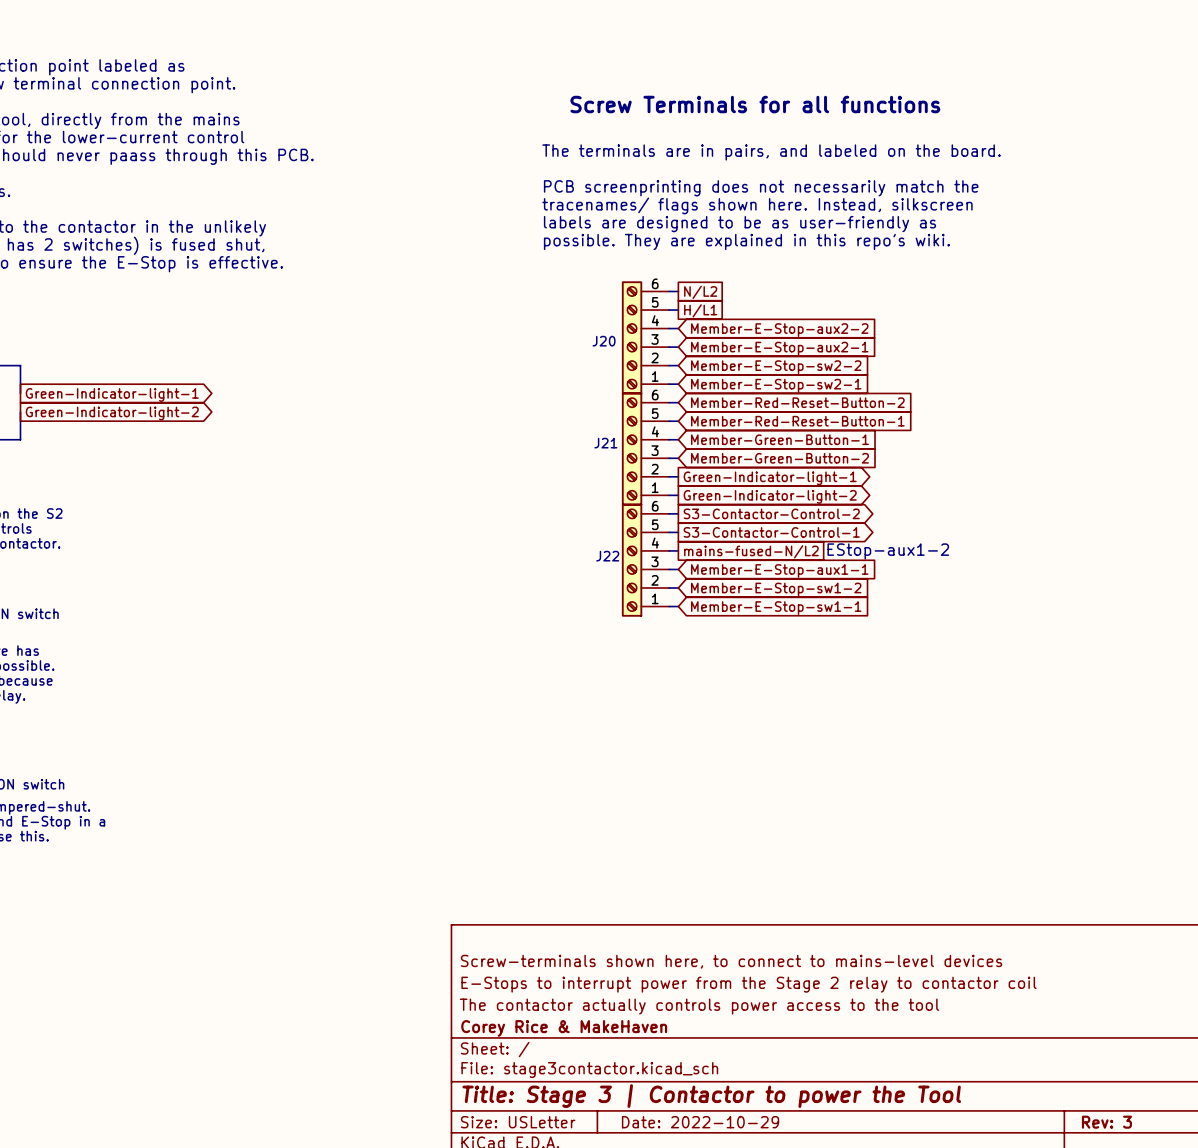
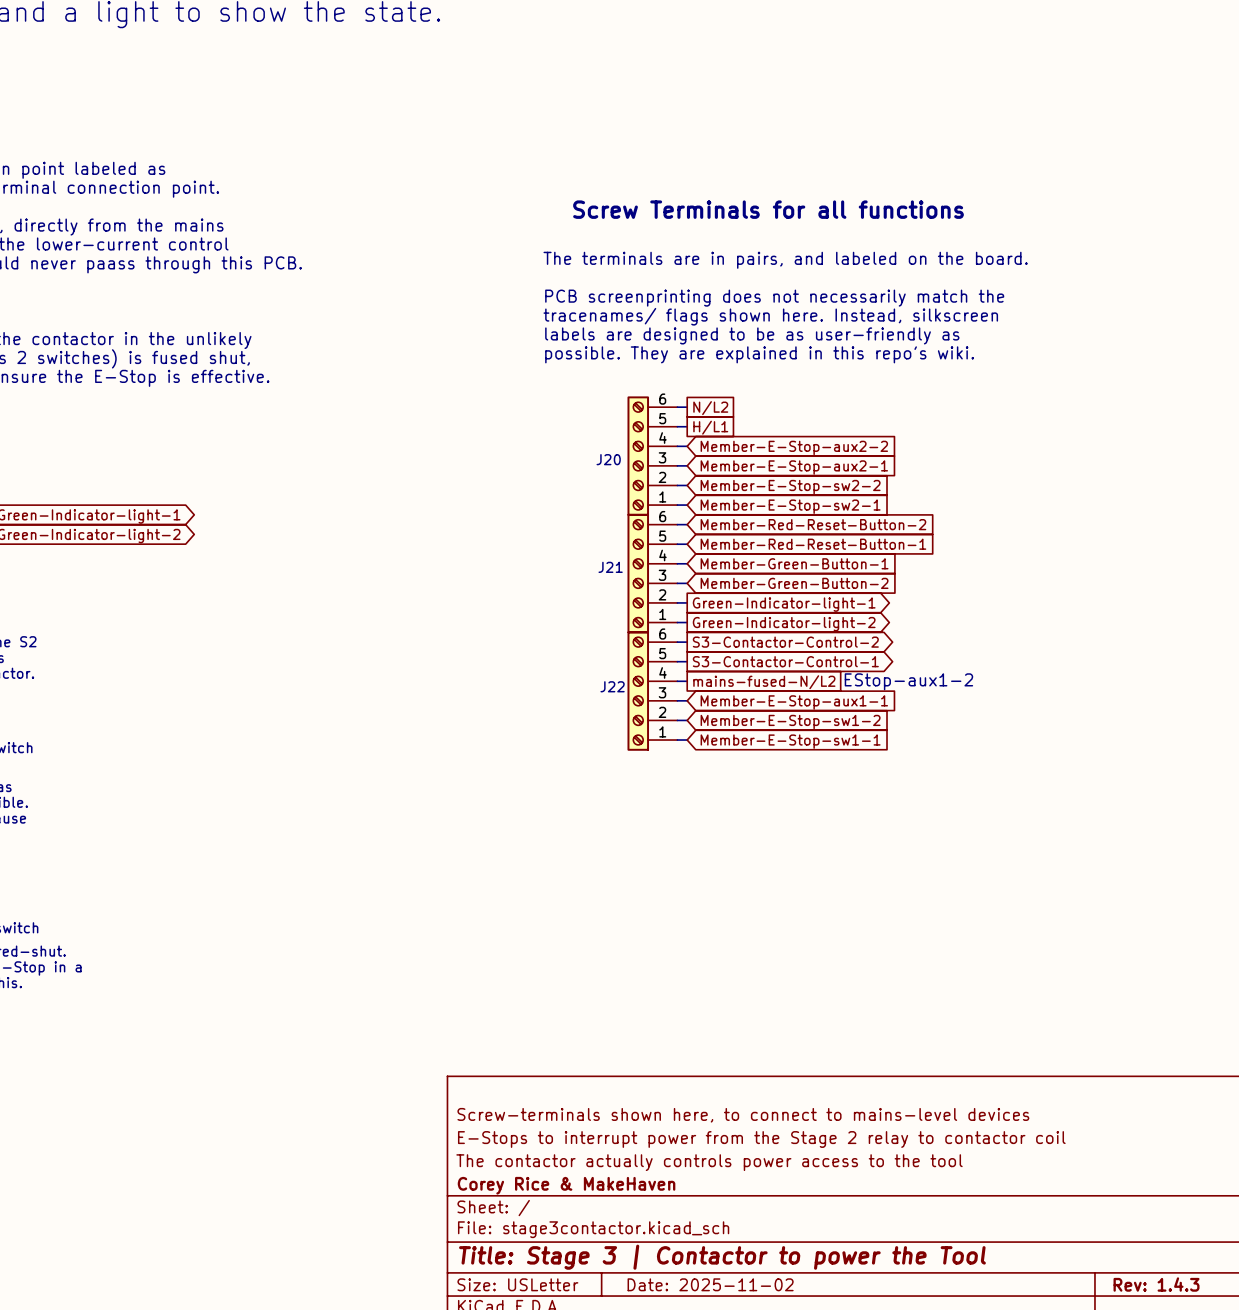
title block: Date: 2022-10-29 (700, 1122) -> Date: 2025-11-02 (710, 1284)
title block: Rev: 3 (1106, 1122) -> Rev: 1.4.3 (1156, 1284)

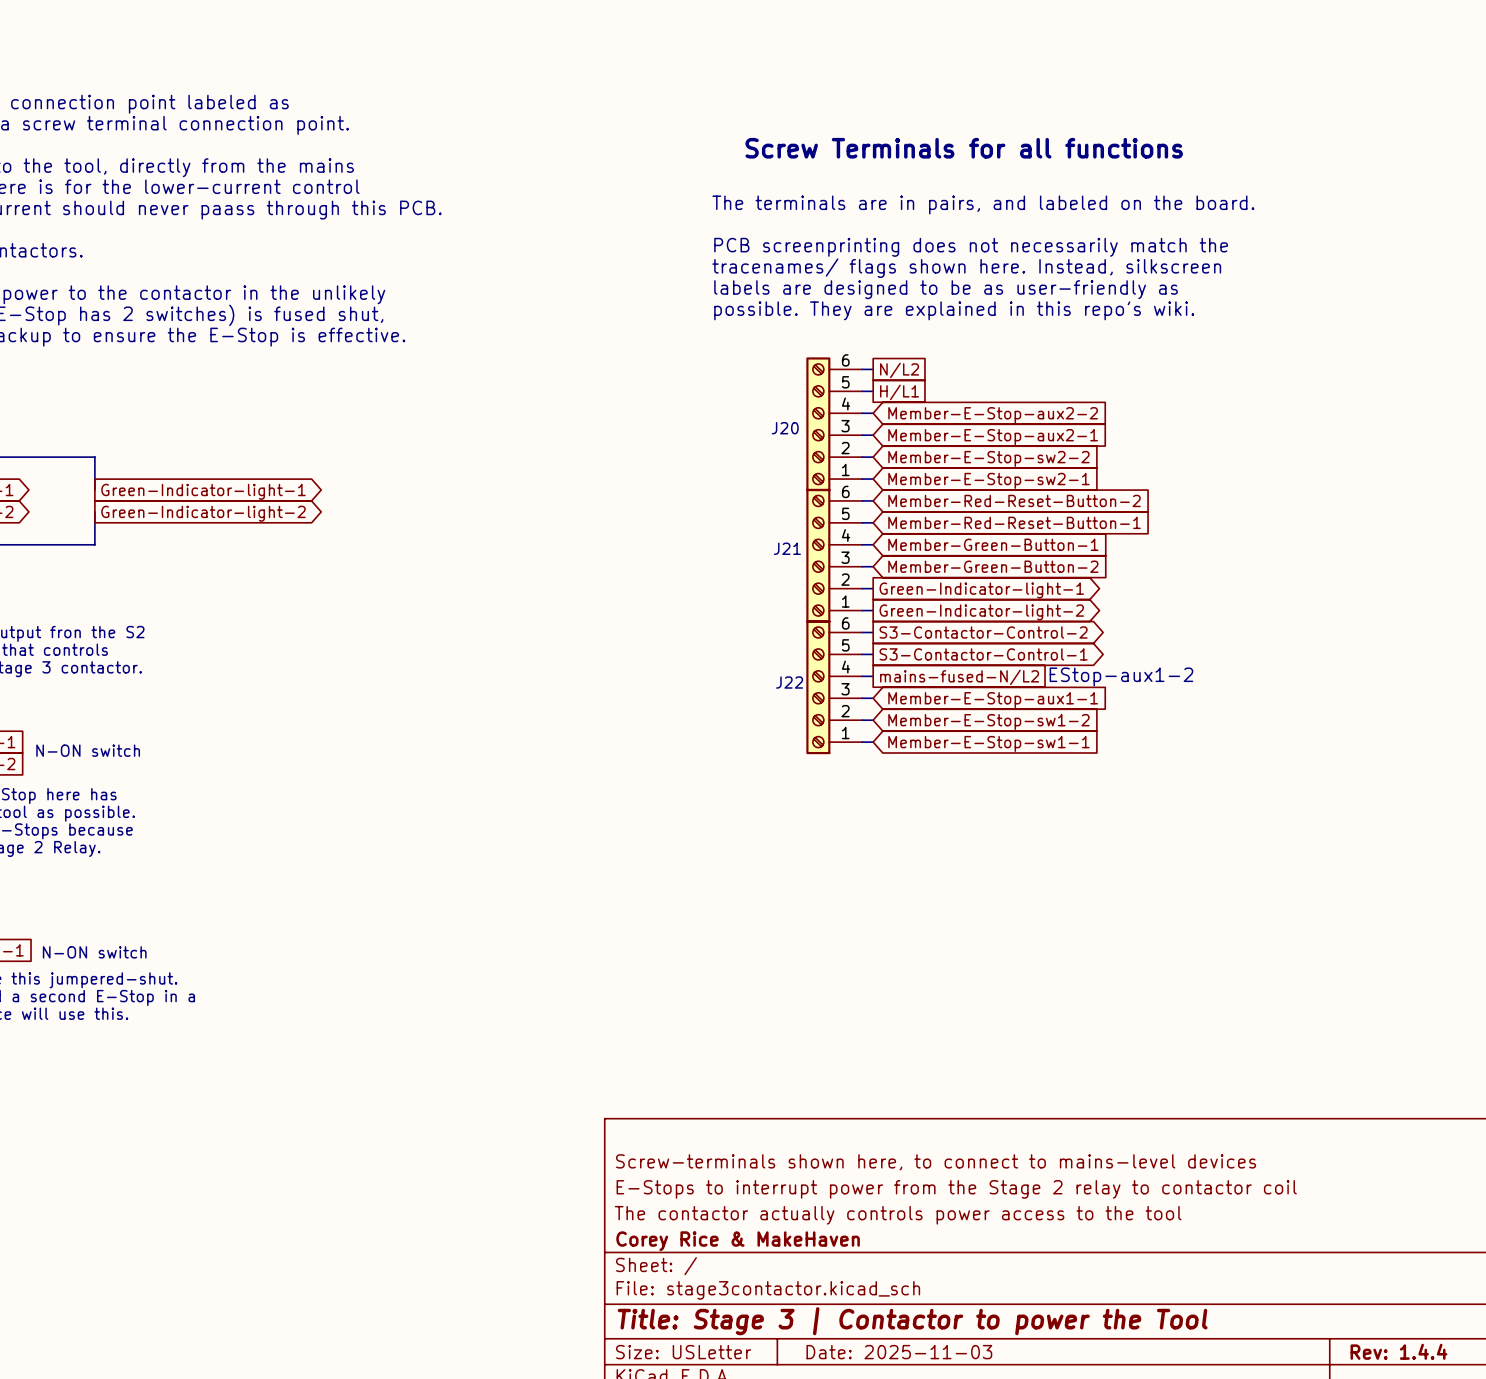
title block: Date: 2025-11-02 (710, 1284) -> Date: 2025-11-03 (899, 1352)
title block: Rev: 1.4.3 (1156, 1284) -> Rev: 1.4.4 (1398, 1351)

